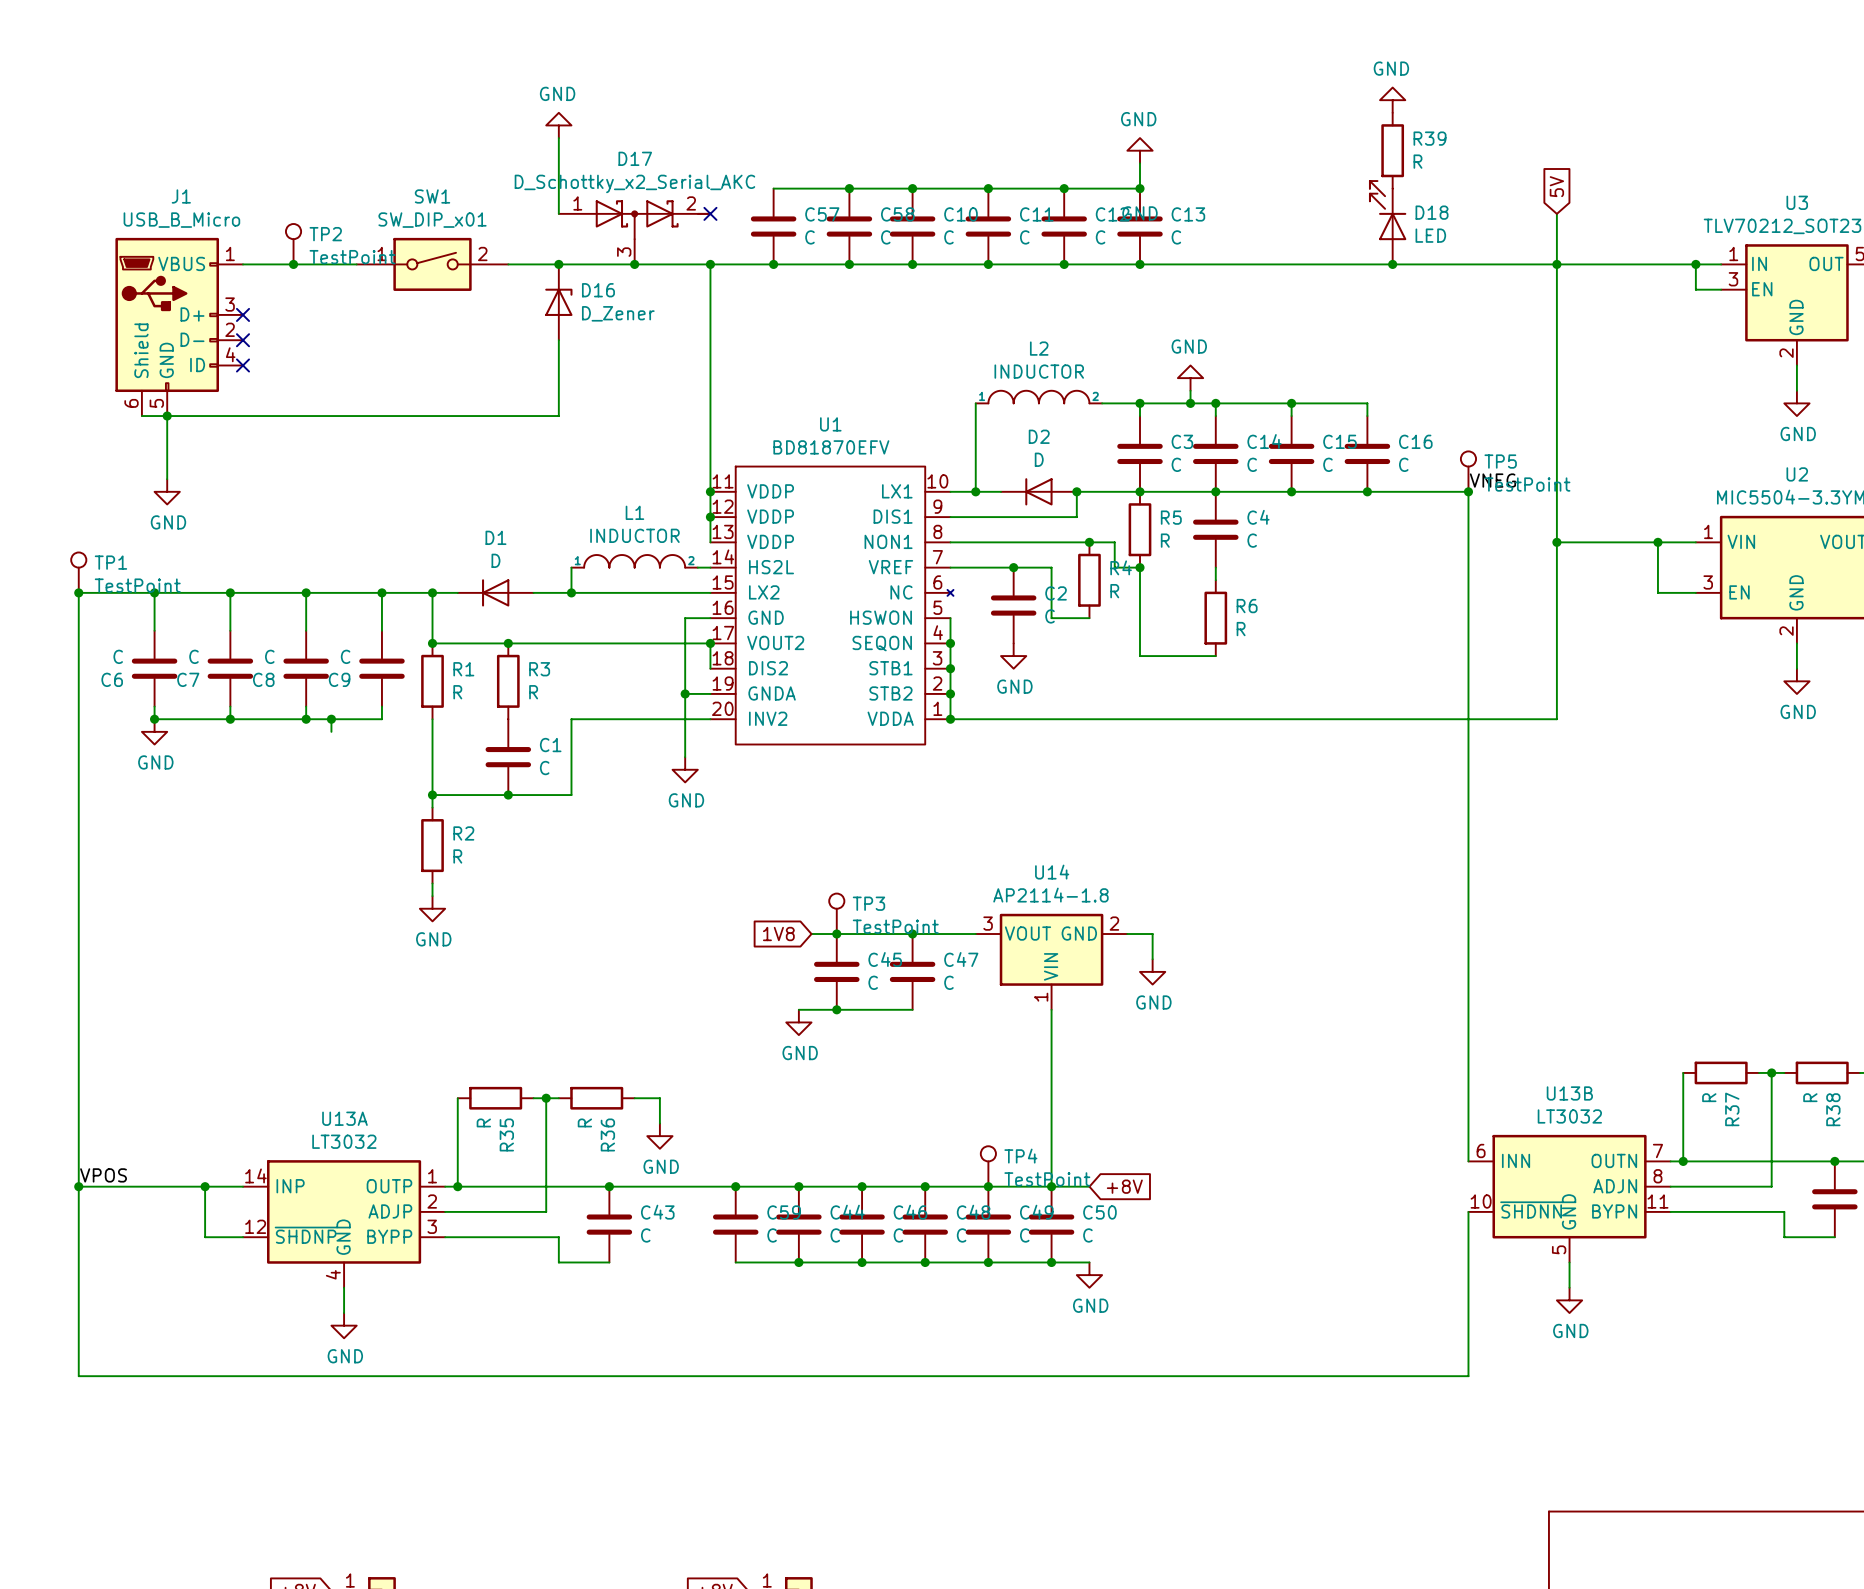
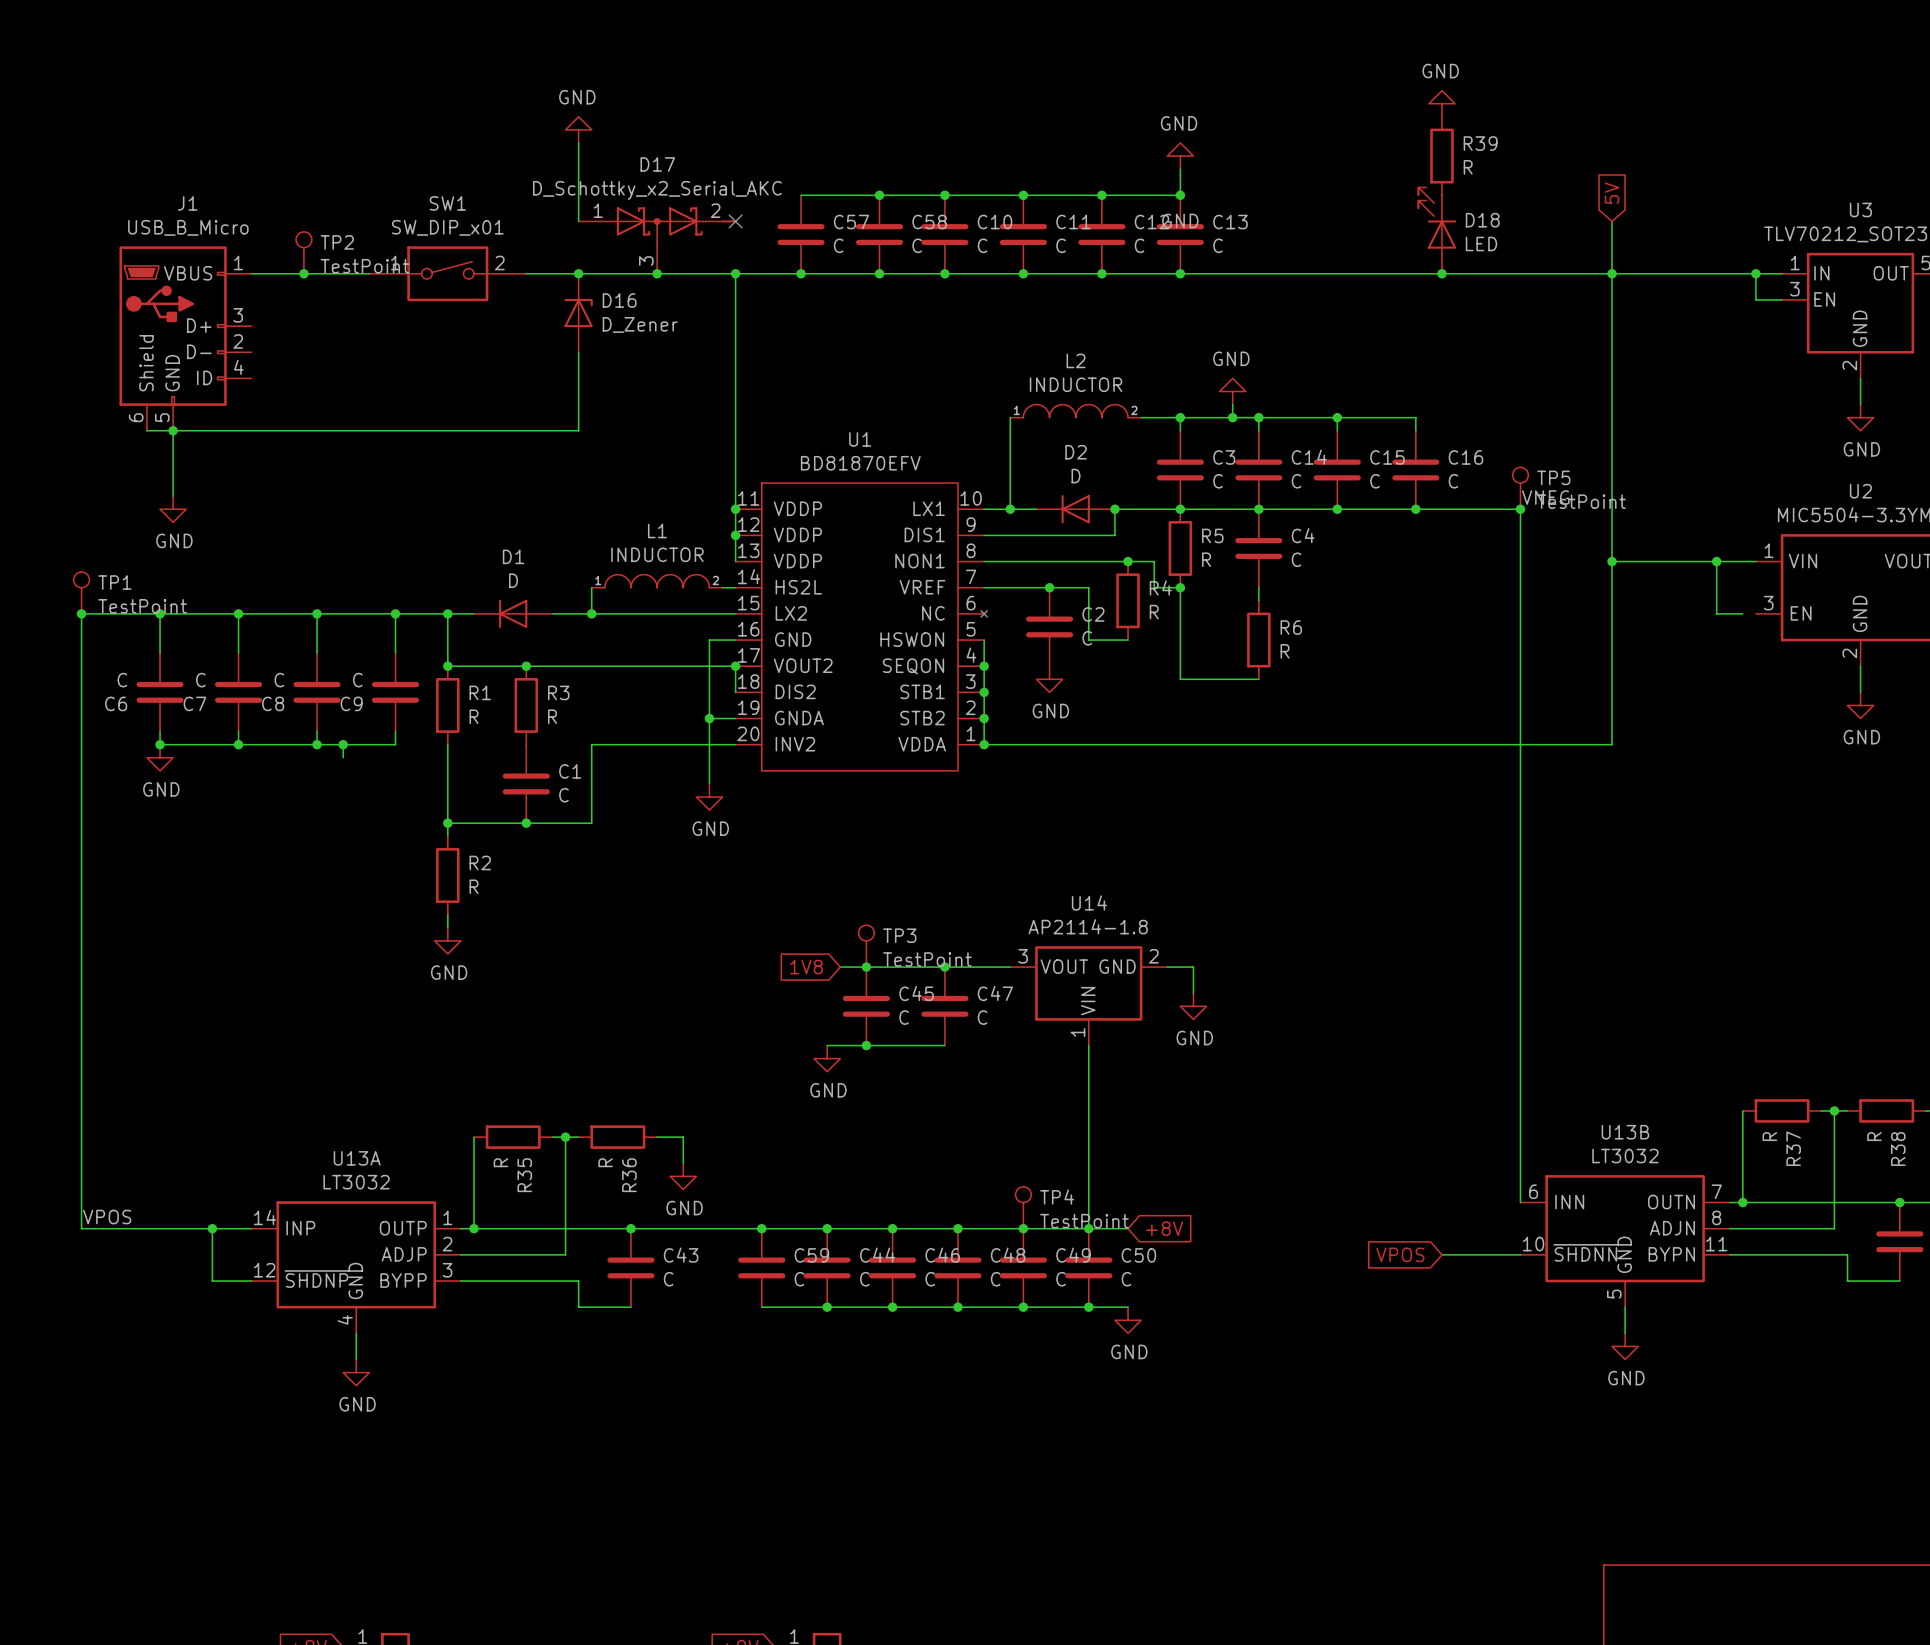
no-connect mark: (243, 314) -> none
no-connect mark: (243, 340) -> none
no-connect mark: (243, 365) -> none
wire: (1683, 592) (1695, 592) -> none
wire: (78, 1186) (78, 1376) (1468, 1376) (1468, 1211) -> (1441, 1254) (1520, 1254)
junction: (78, 1186) -> none
global label: none -> VPOS (1400, 1254)

